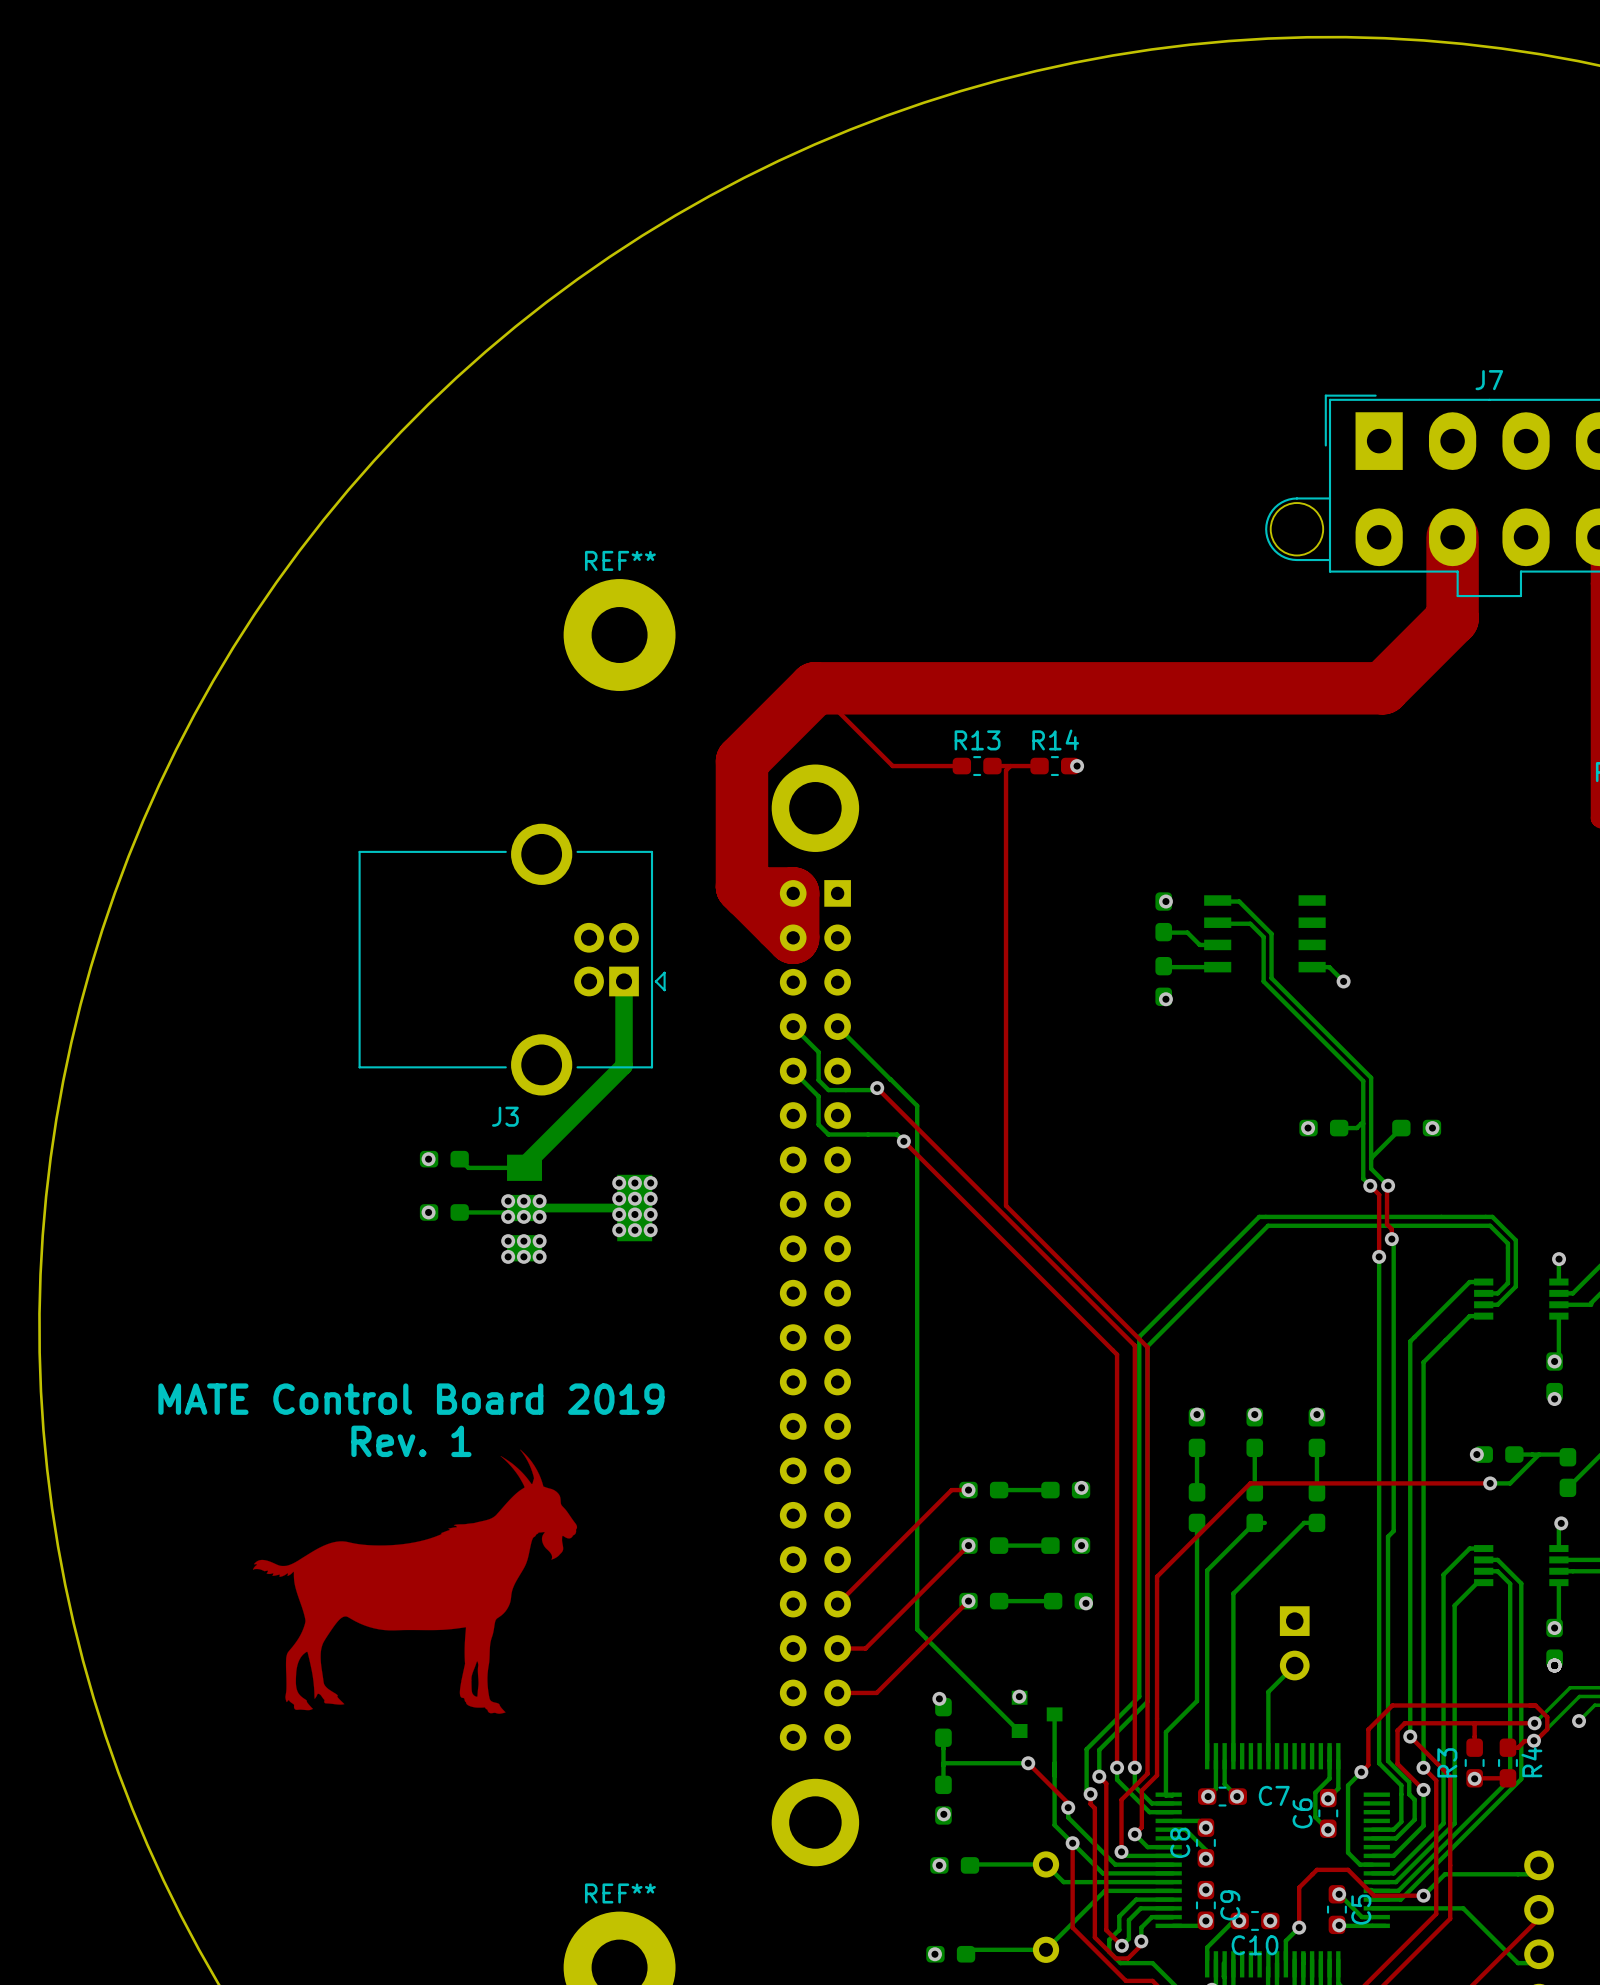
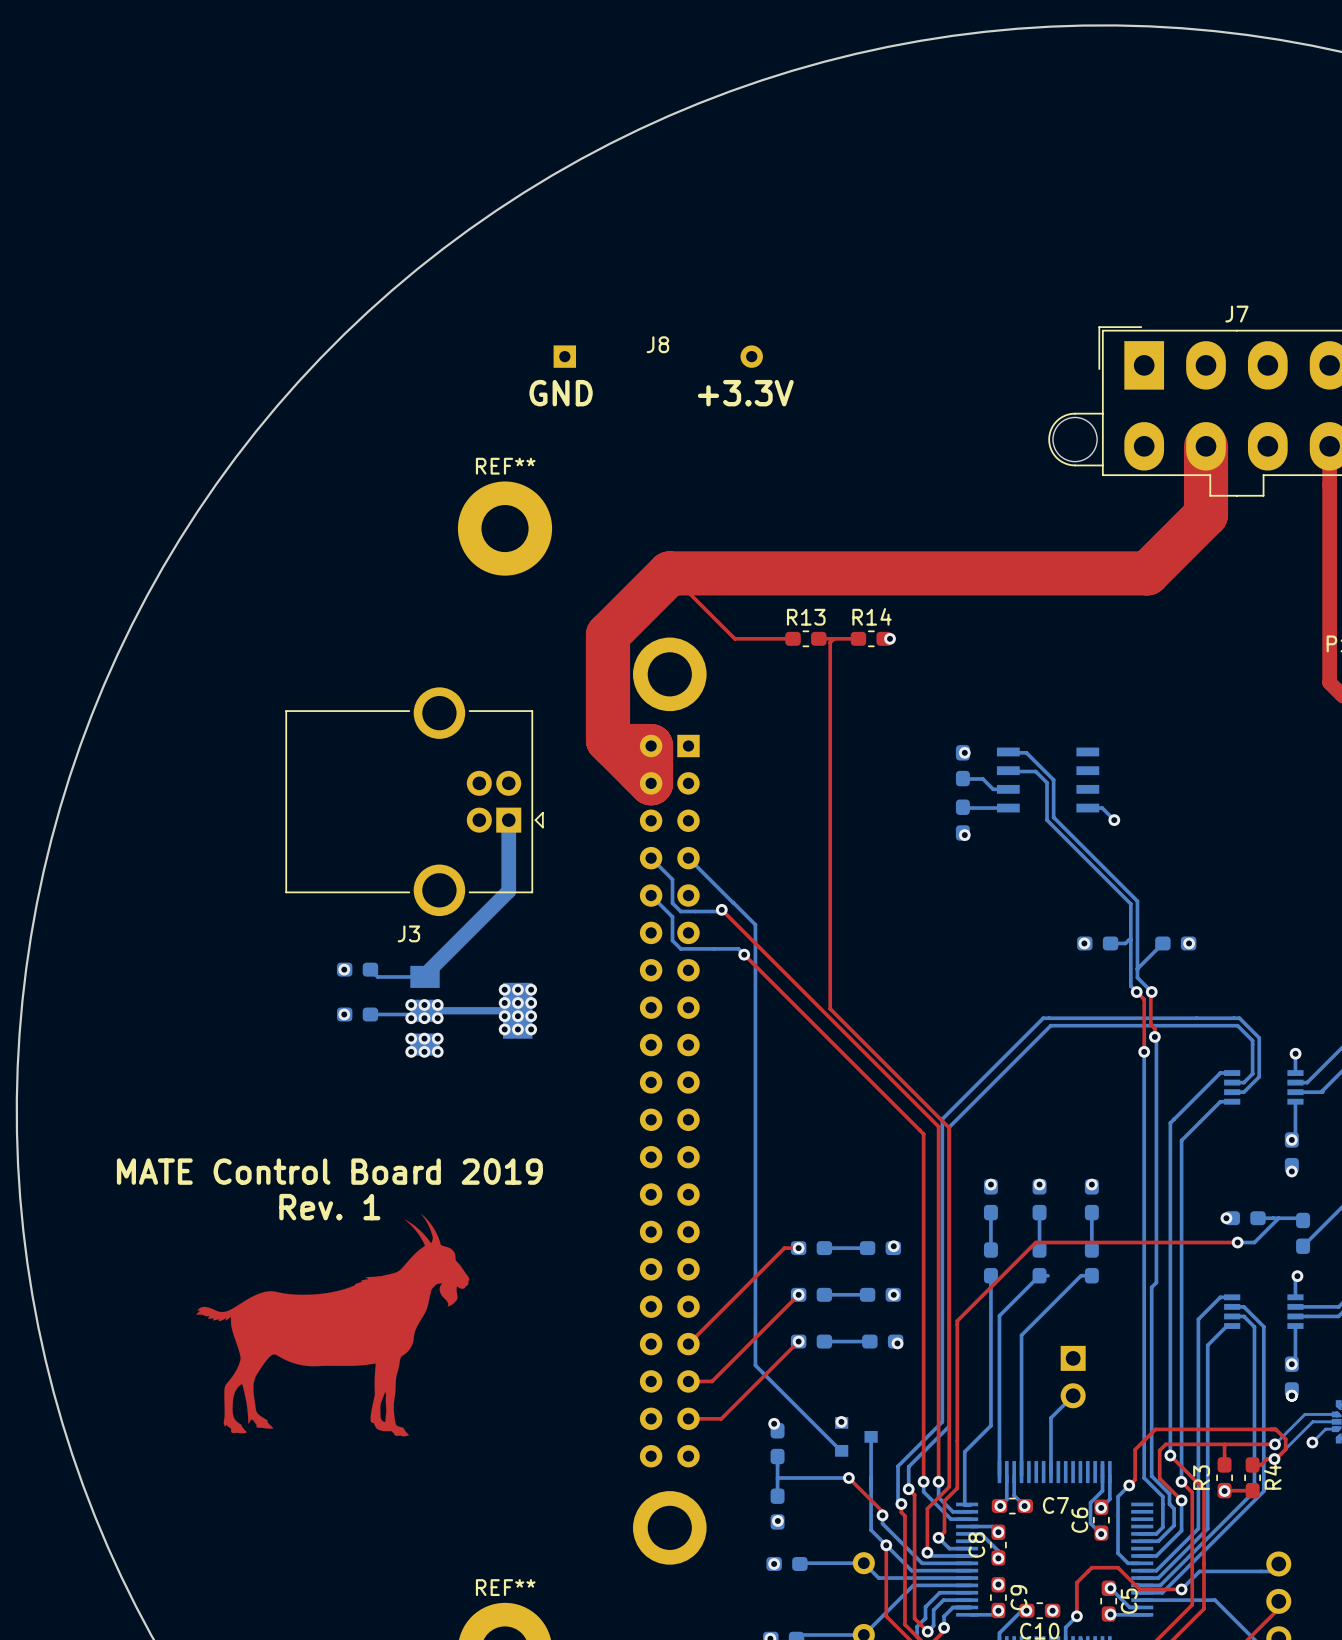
J8: none -> (658, 356)
text: none -> GND (561, 393)
text: none -> +3.3V (745, 393)

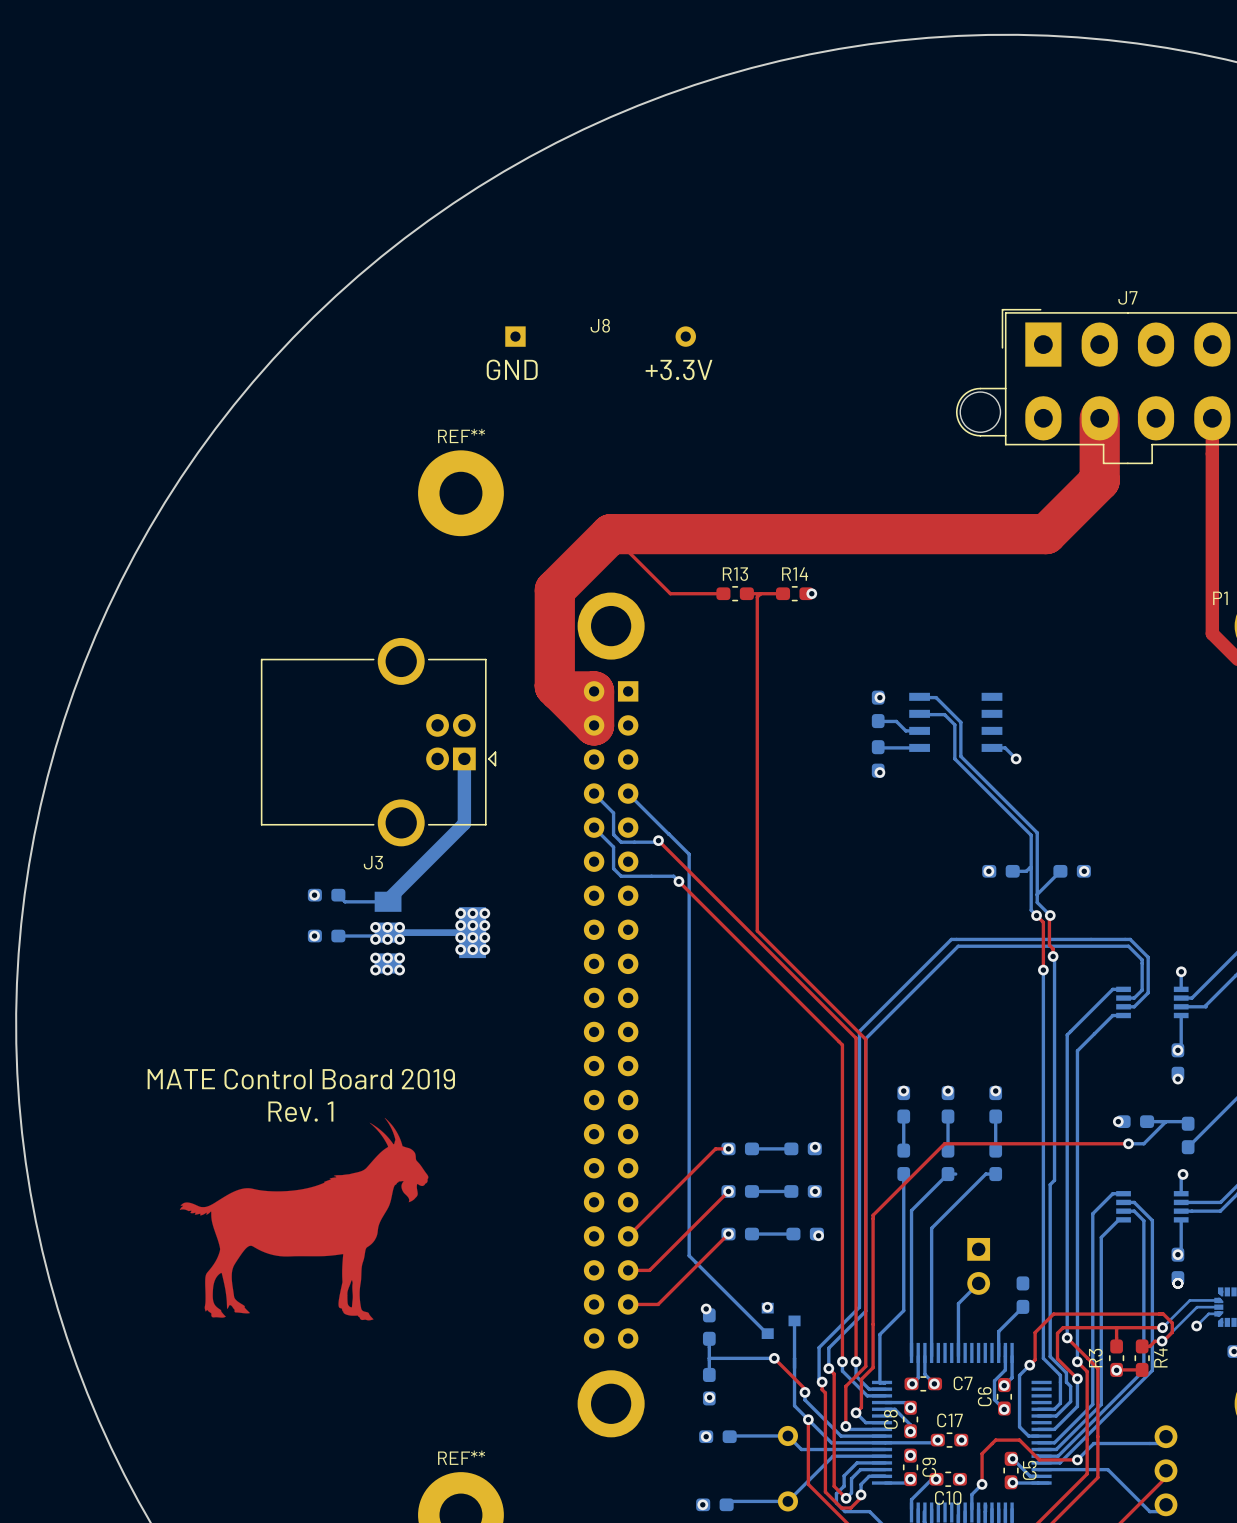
part: none -> (1022, 1295)
bottom track: none -> (1022, 1307) (998, 1331) (998, 1356)
bottom track: none -> (937, 1440) (935, 1442) (885, 1442)
via: none -> (937, 1440)
C17: none -> (949, 1440)
via: none -> (961, 1440)

